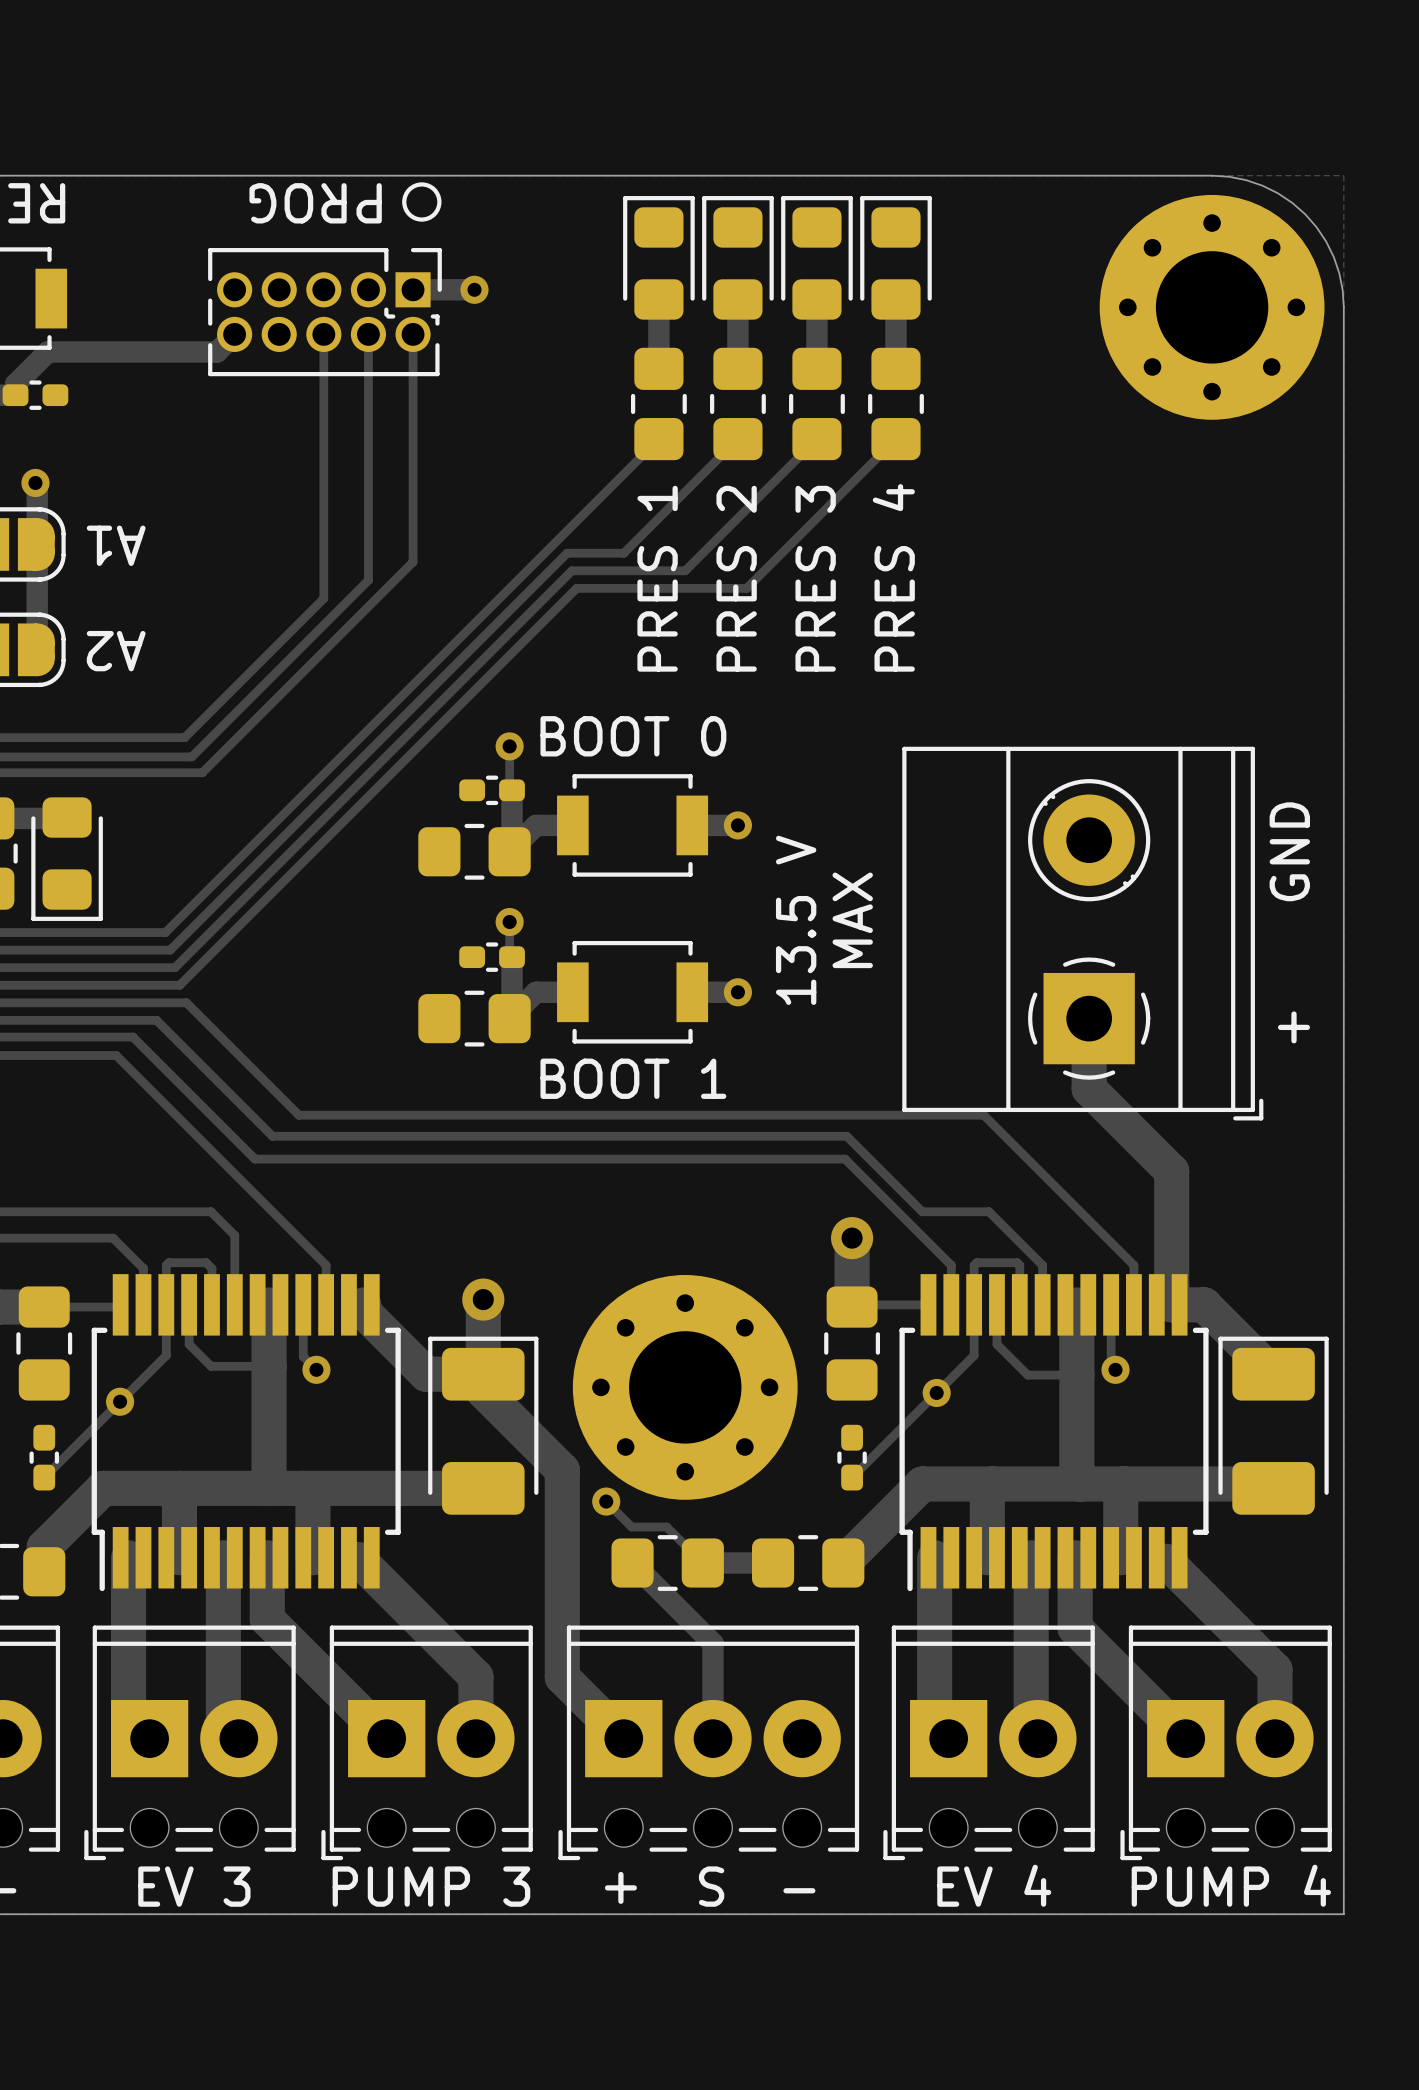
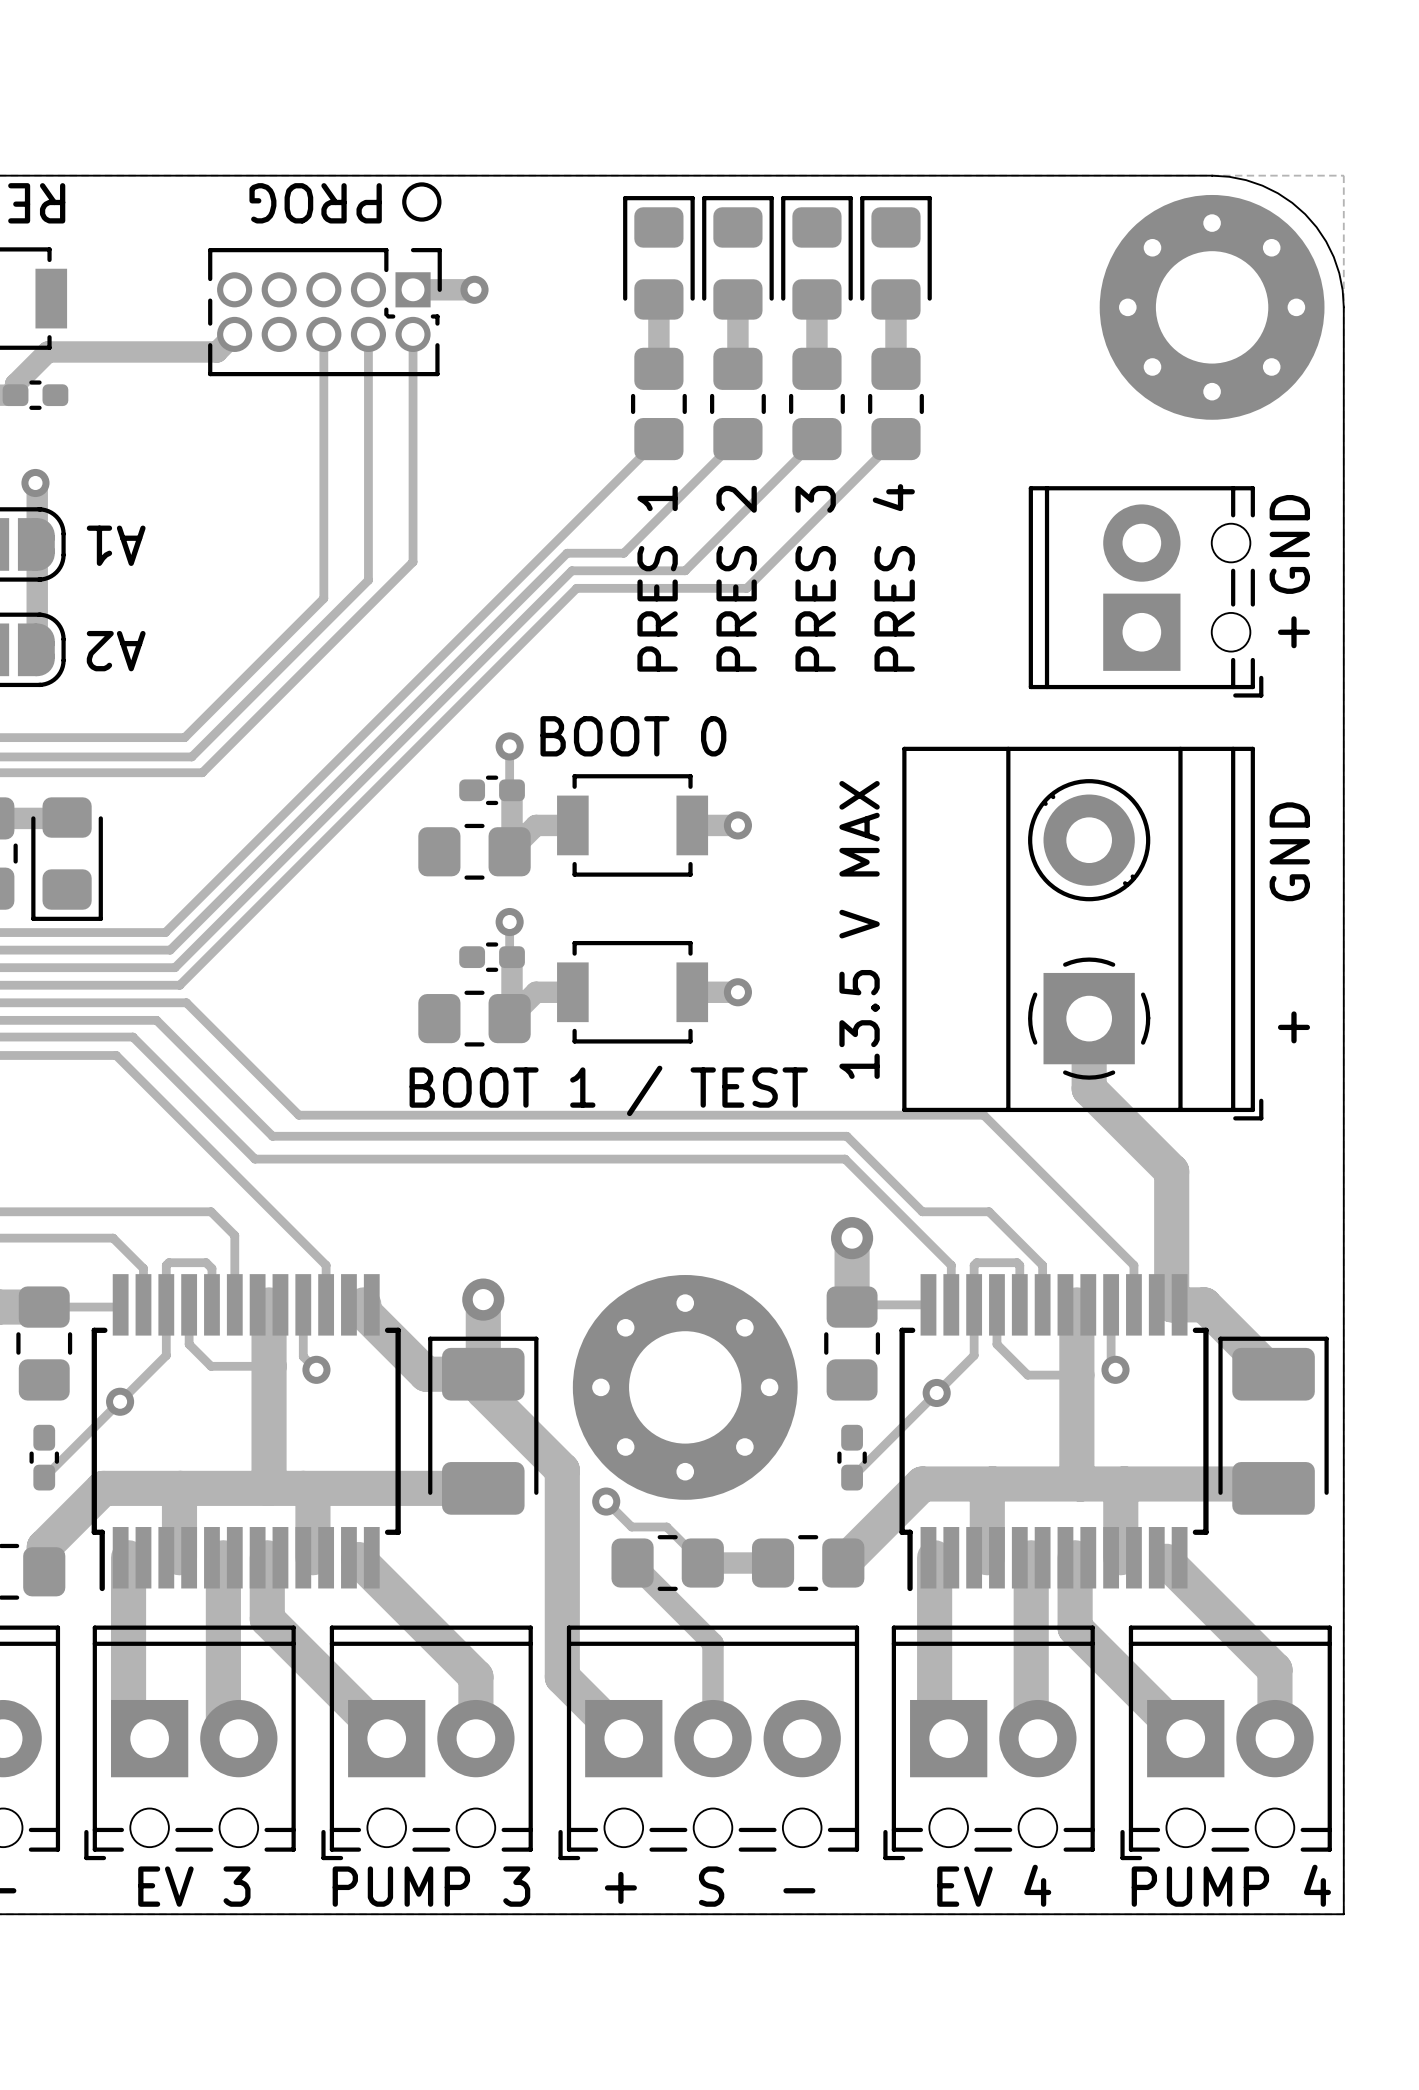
text: none -> GND (1289, 544)
part: none -> (1146, 591)
text: none -> + (1293, 632)
text: 13.5 V (796, 920) -> none
text: MAX (852, 920) -> 13.5 V MAX (859, 929)
text: BOOT 1 (633, 1078) -> BOOT 1 / TEST (608, 1090)

